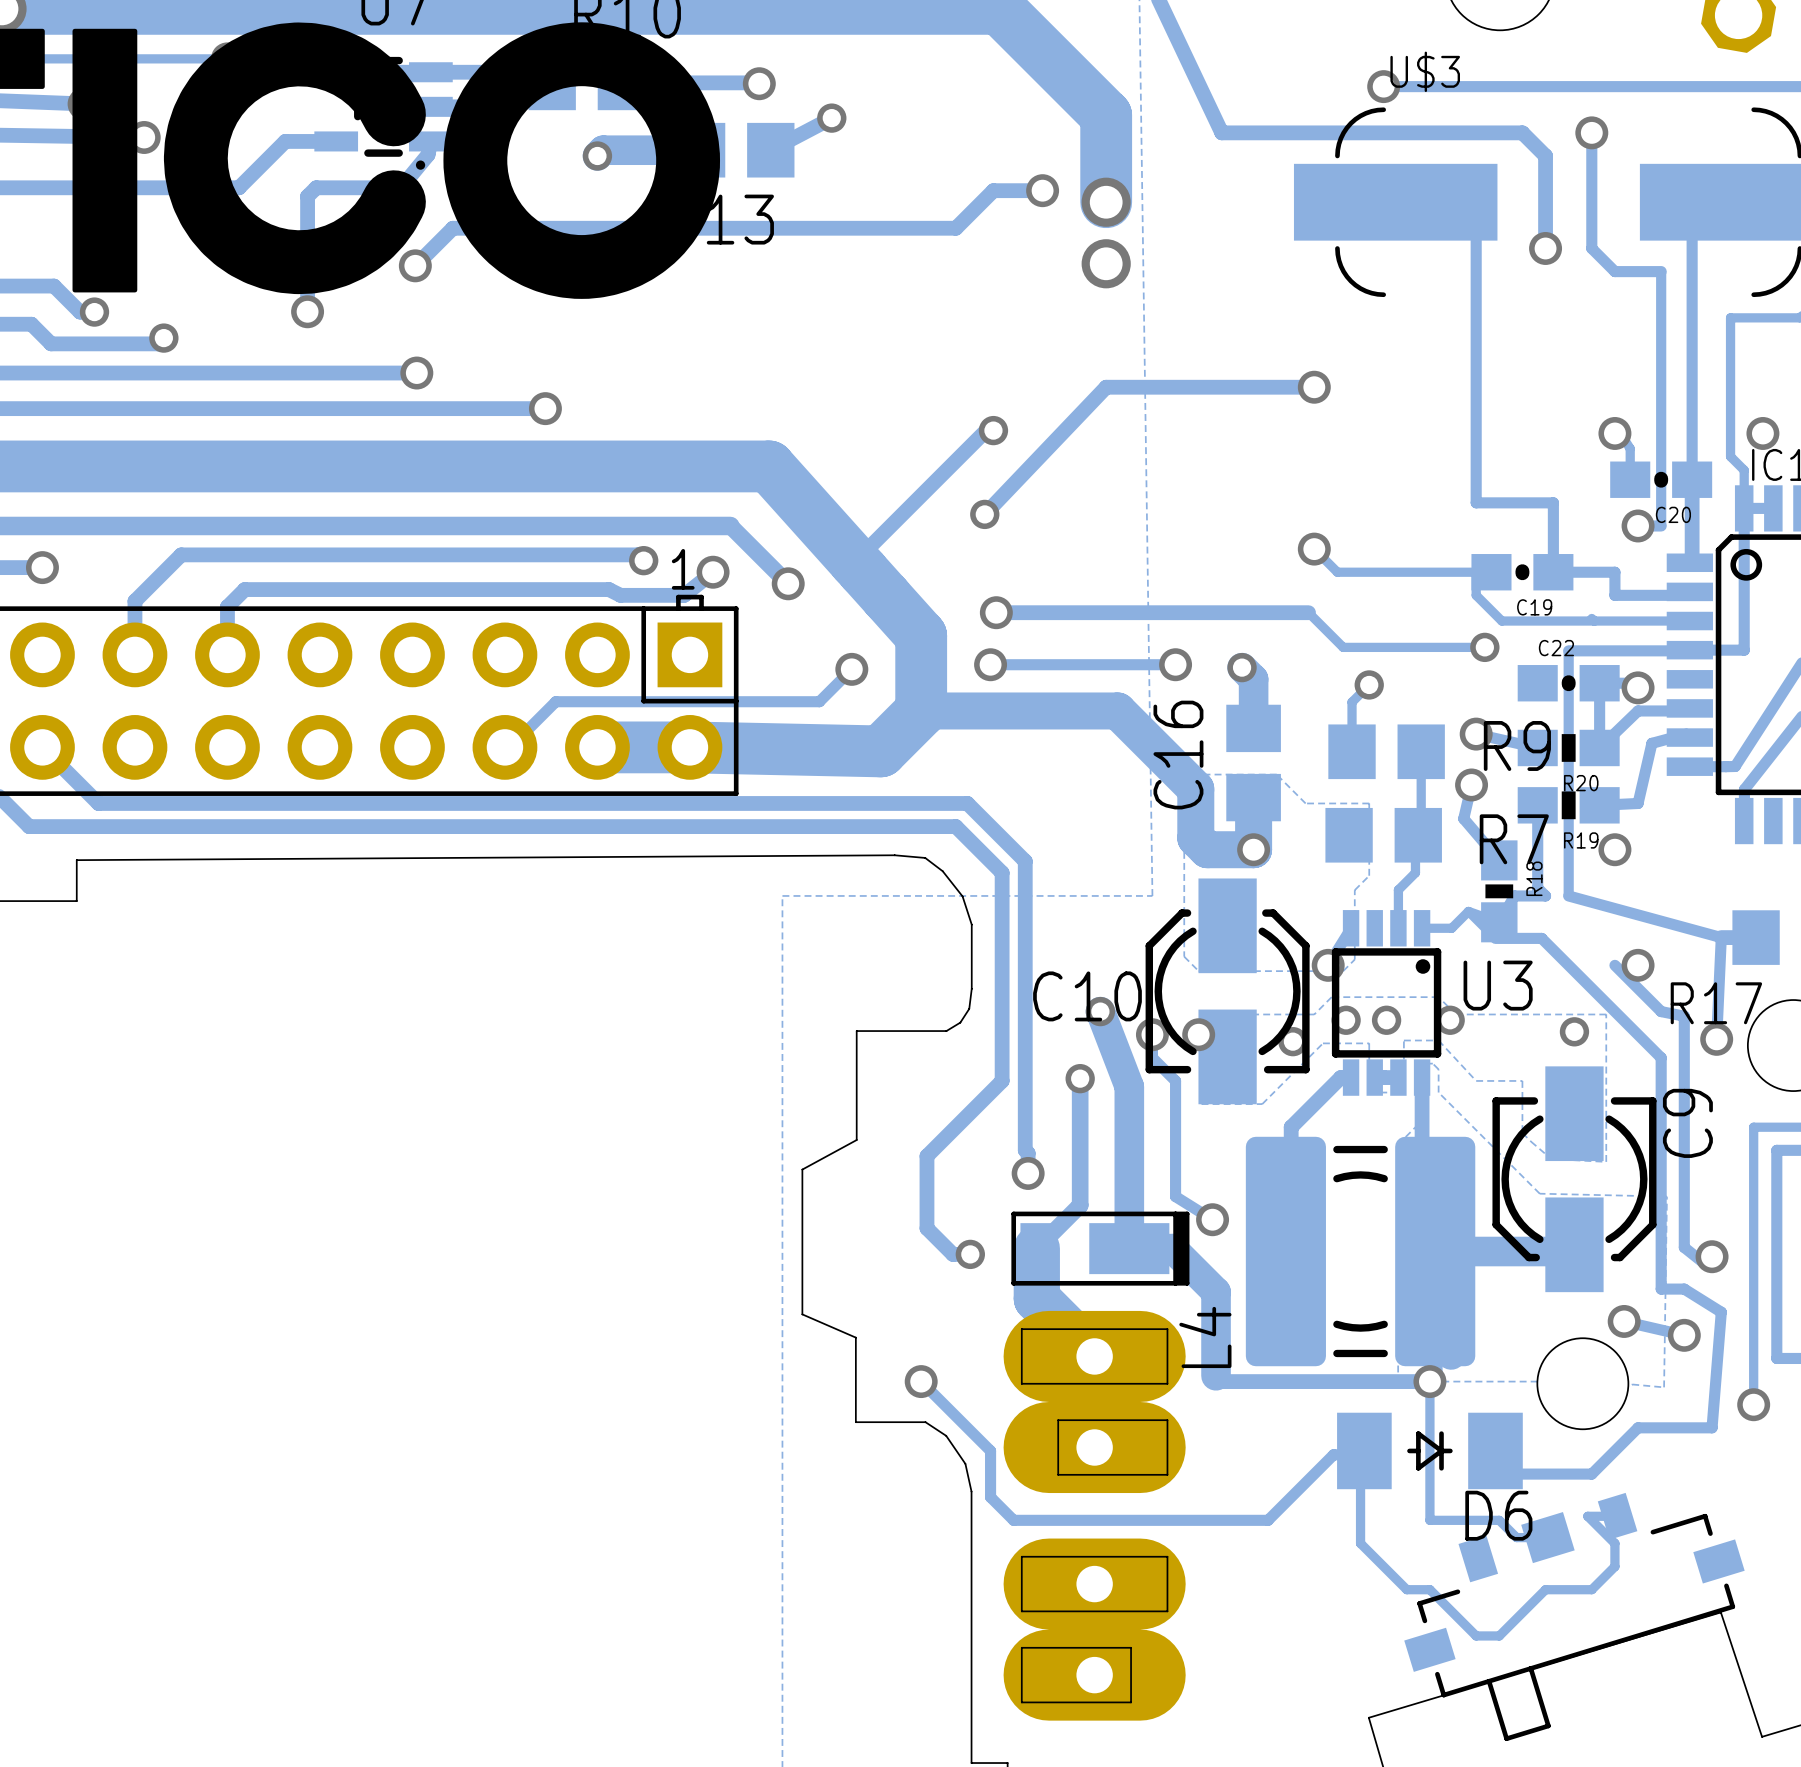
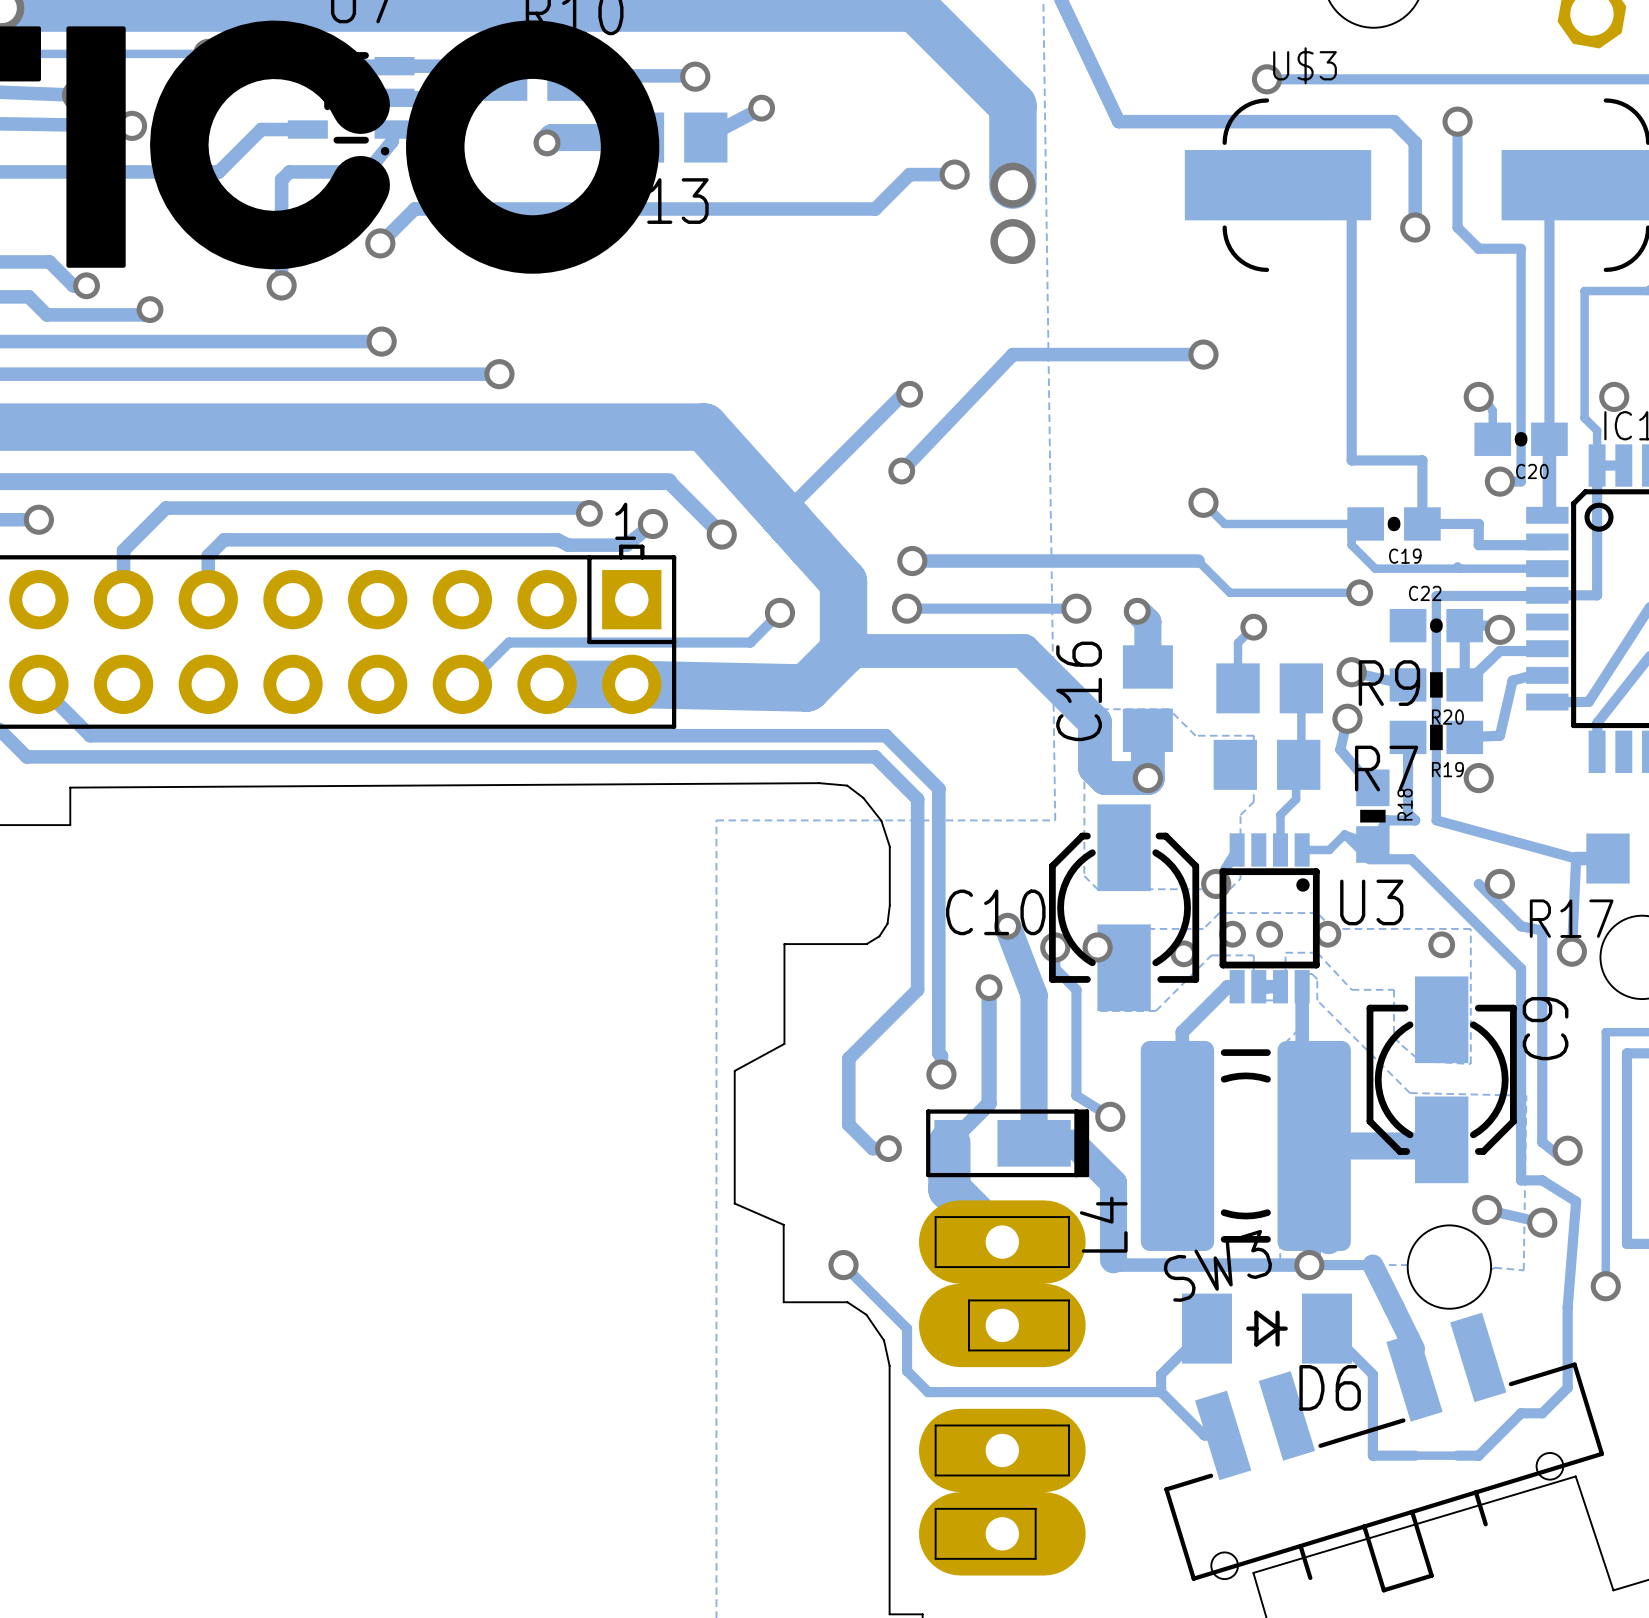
track: (1429, 1381) (1429, 1520) (1499, 1520) (1516, 1537) (1547, 1537) -> (1309, 1265) (1372, 1265) (1414, 1349) (1414, 1376)
track: (1712, 1427) (1638, 1427) (1591, 1474) (1518, 1474) (1495, 1450) -> none
track: none -> (1206, 1328) (1161, 1374) (1161, 1392) (1204, 1435) (1223, 1435)
D6 position: (1429, 1450) -> (1267, 1328)
track: (1360, 1454) (1360, 1543) (1406, 1589) (1429, 1589) (1476, 1635) (1499, 1635) (1545, 1589) -> (1327, 1328) (1372, 1374) (1372, 1455) (1415, 1455)
track: (1360, 1454) (1333, 1454) (1268, 1520) -> none
track: (1617, 1516) (1587, 1516) (1614, 1543) (1614, 1566) (1591, 1589) -> (1567, 1307) (1567, 1387) (1542, 1413) (1521, 1413) (1478, 1455) (1457, 1455)
SW3: none -> (1384, 1452)
part: (1574, 1616) -> none

